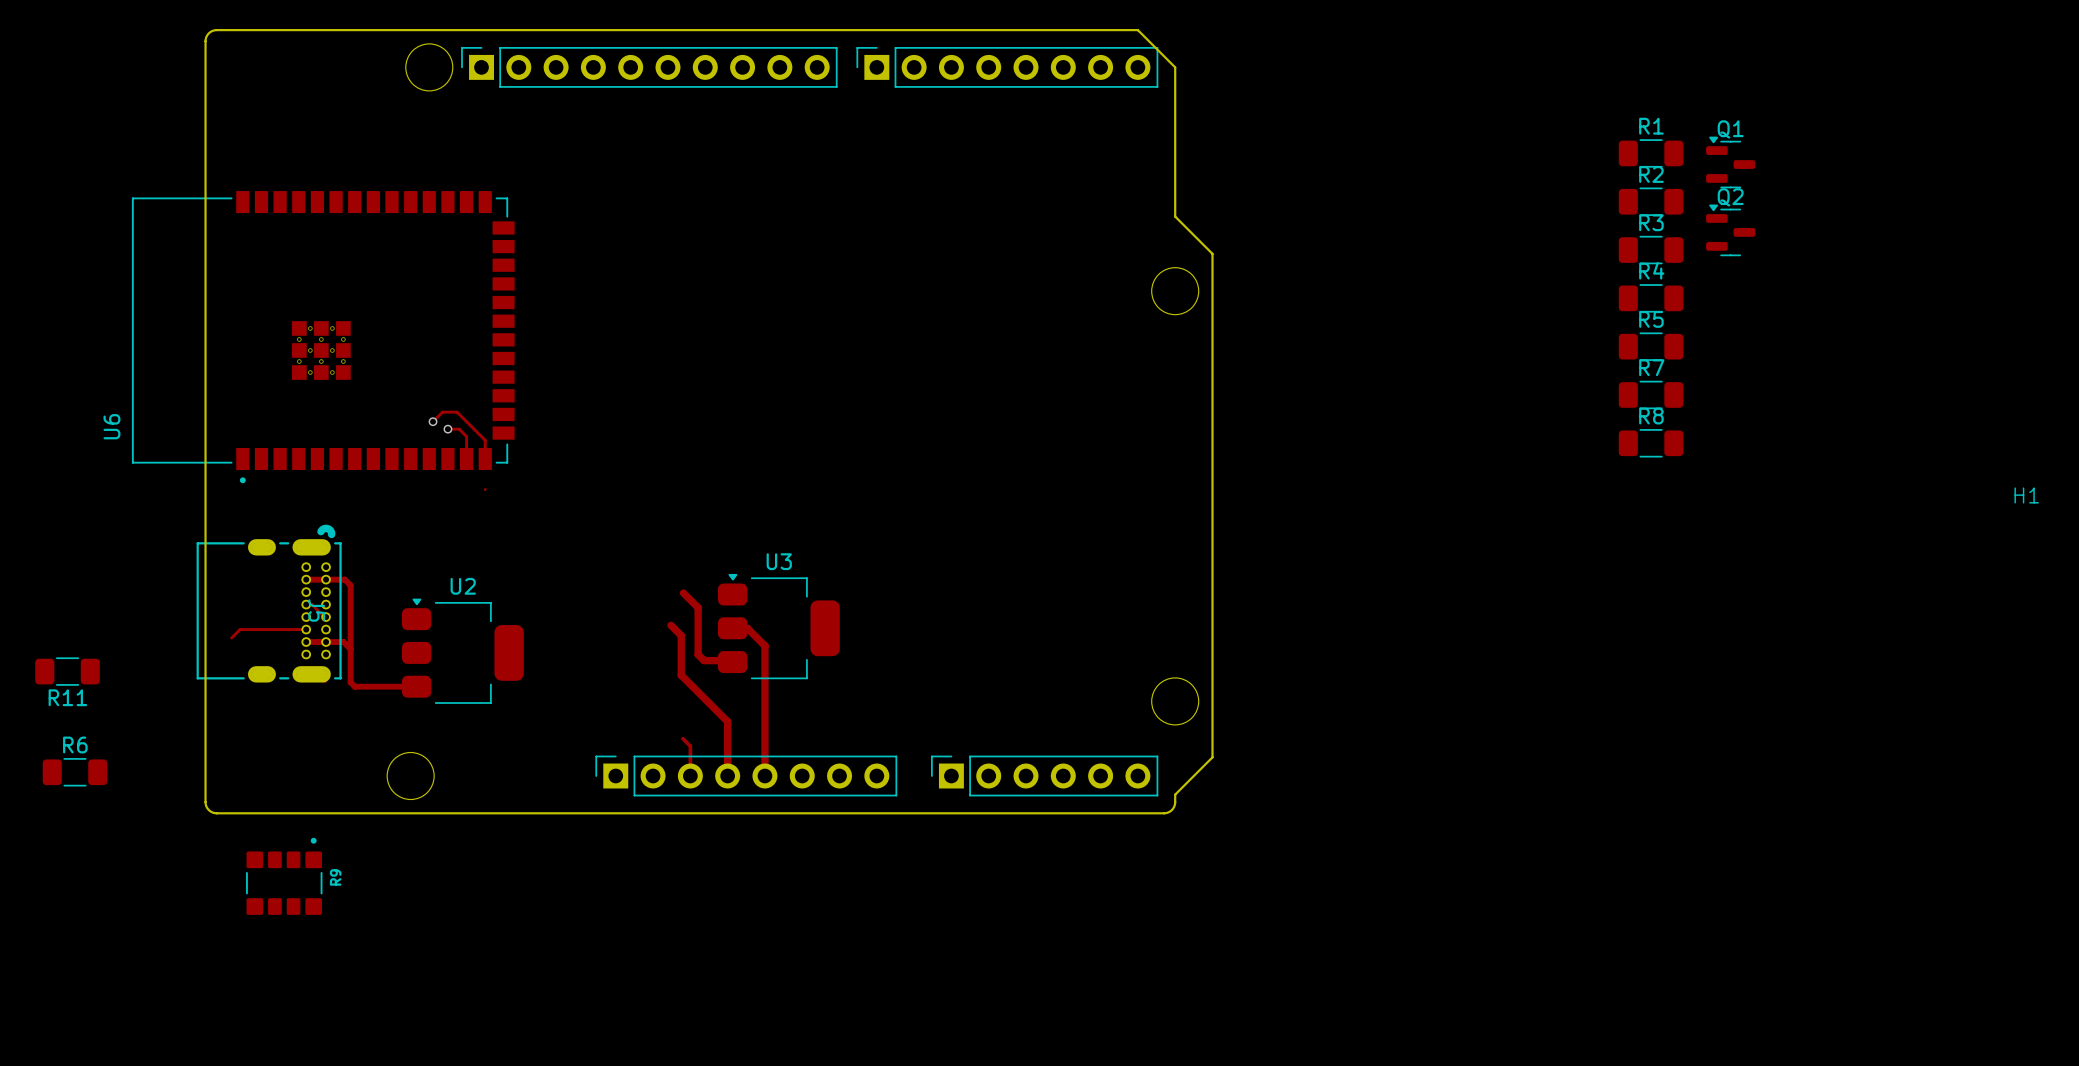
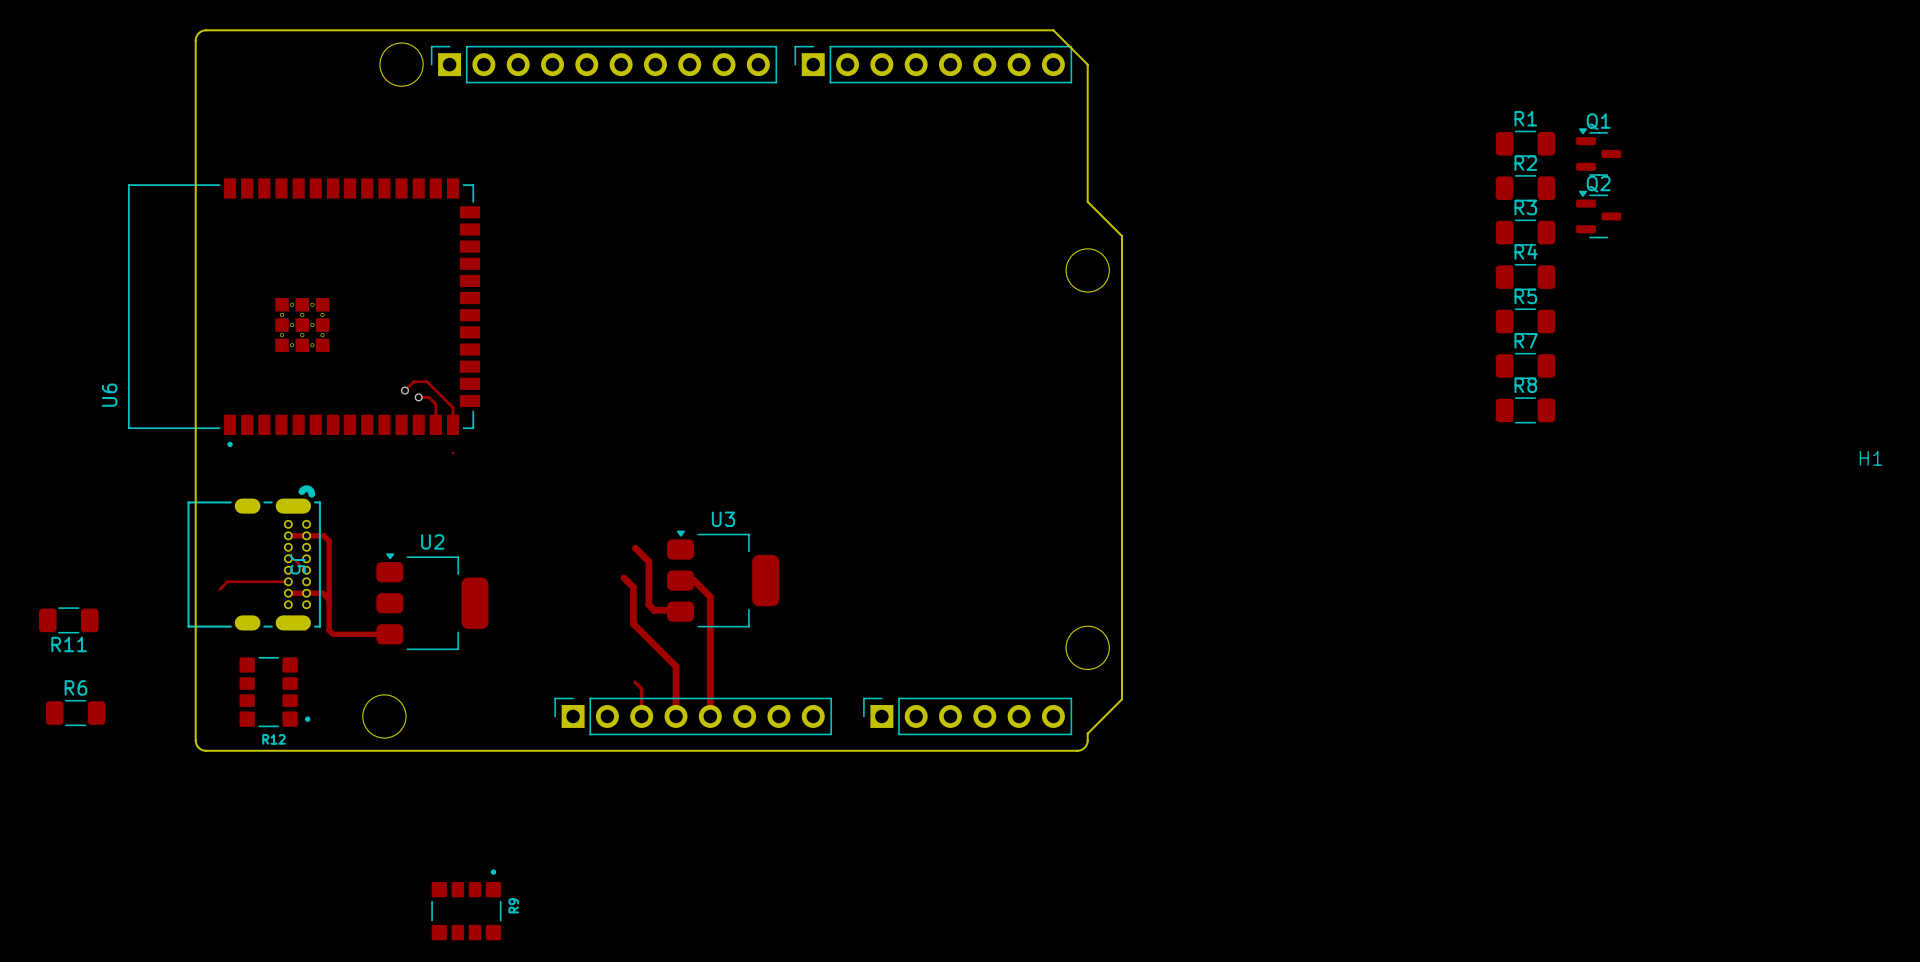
R12: none -> (274, 692)
R9 position: (284, 876) -> (466, 904)

